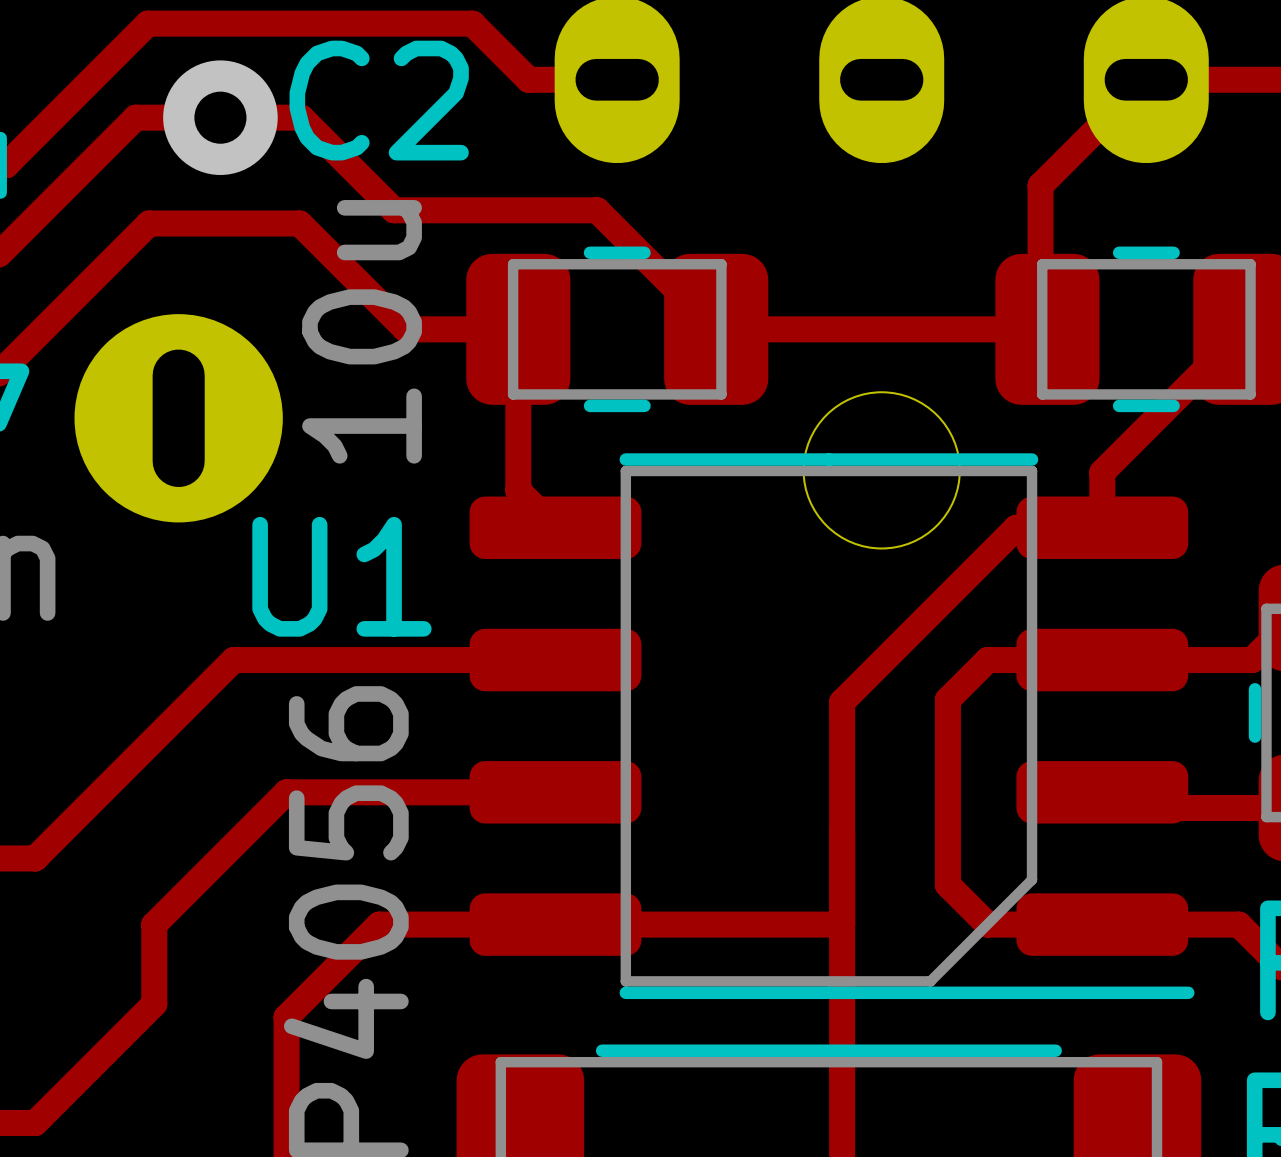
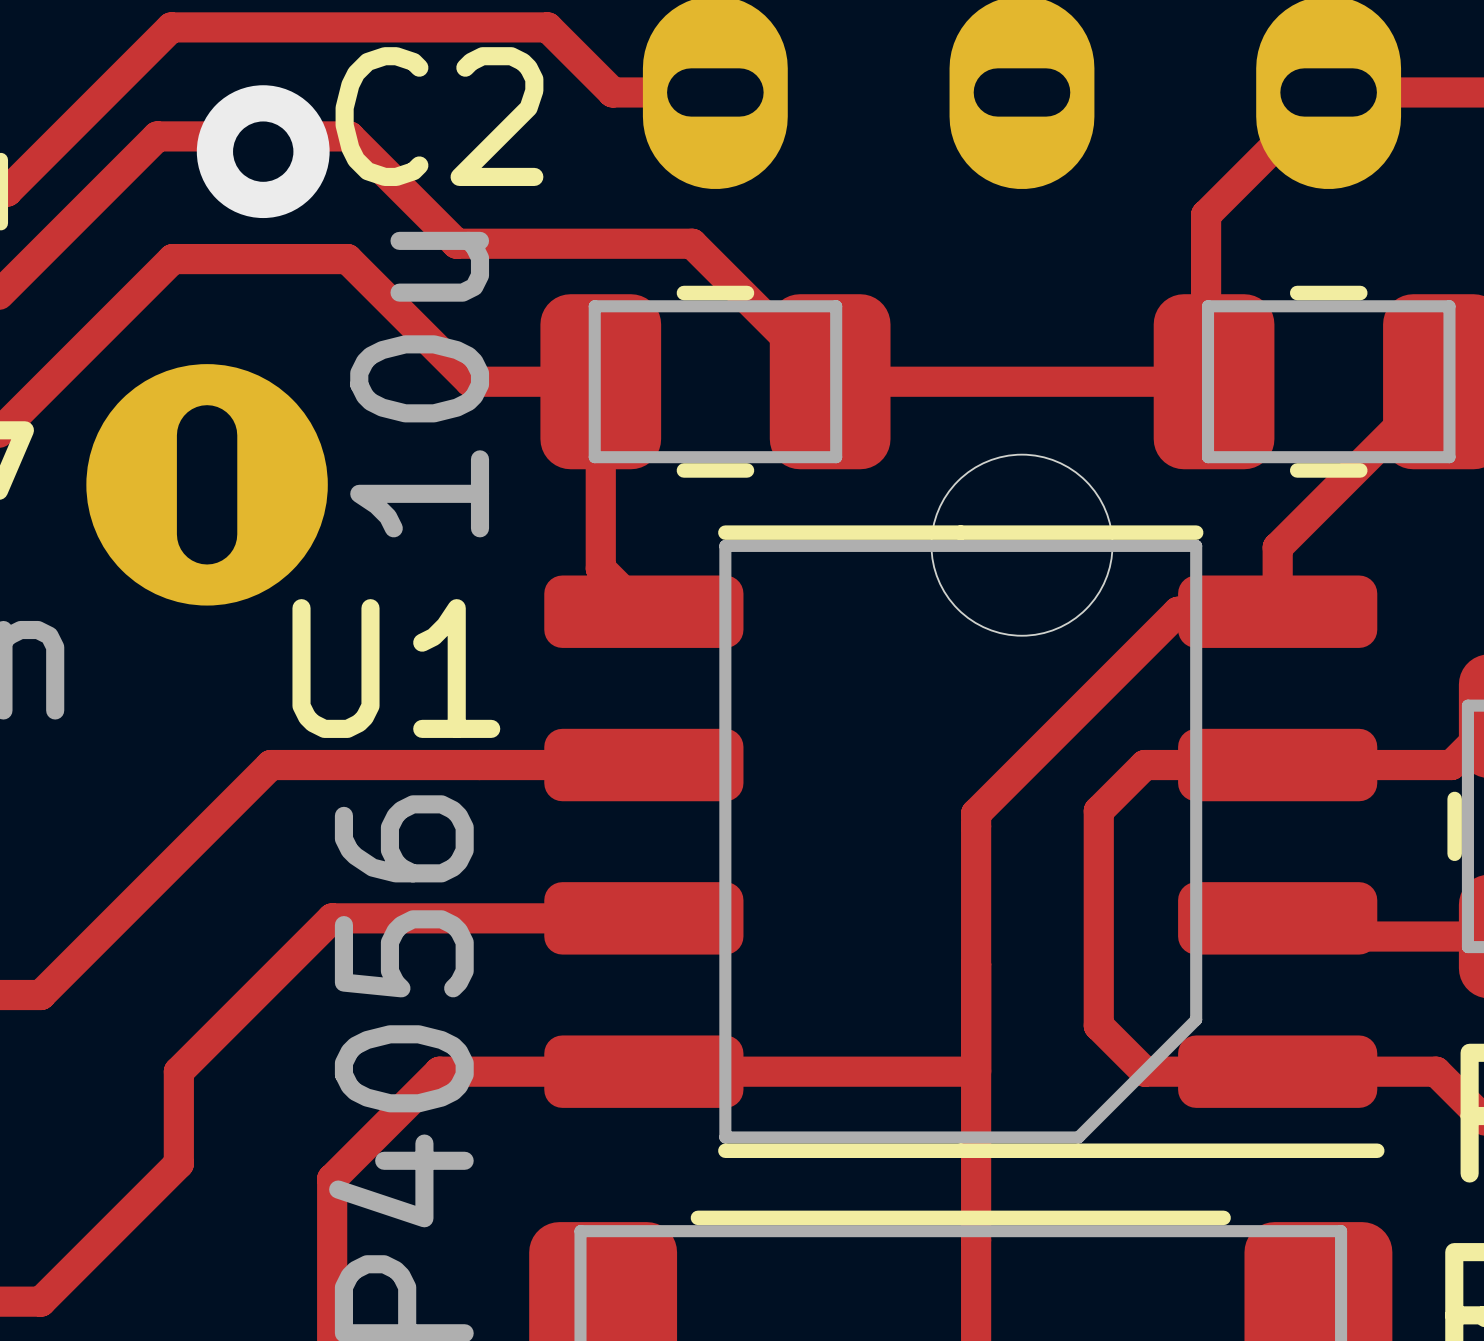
via position: (220, 117) -> (263, 151)

